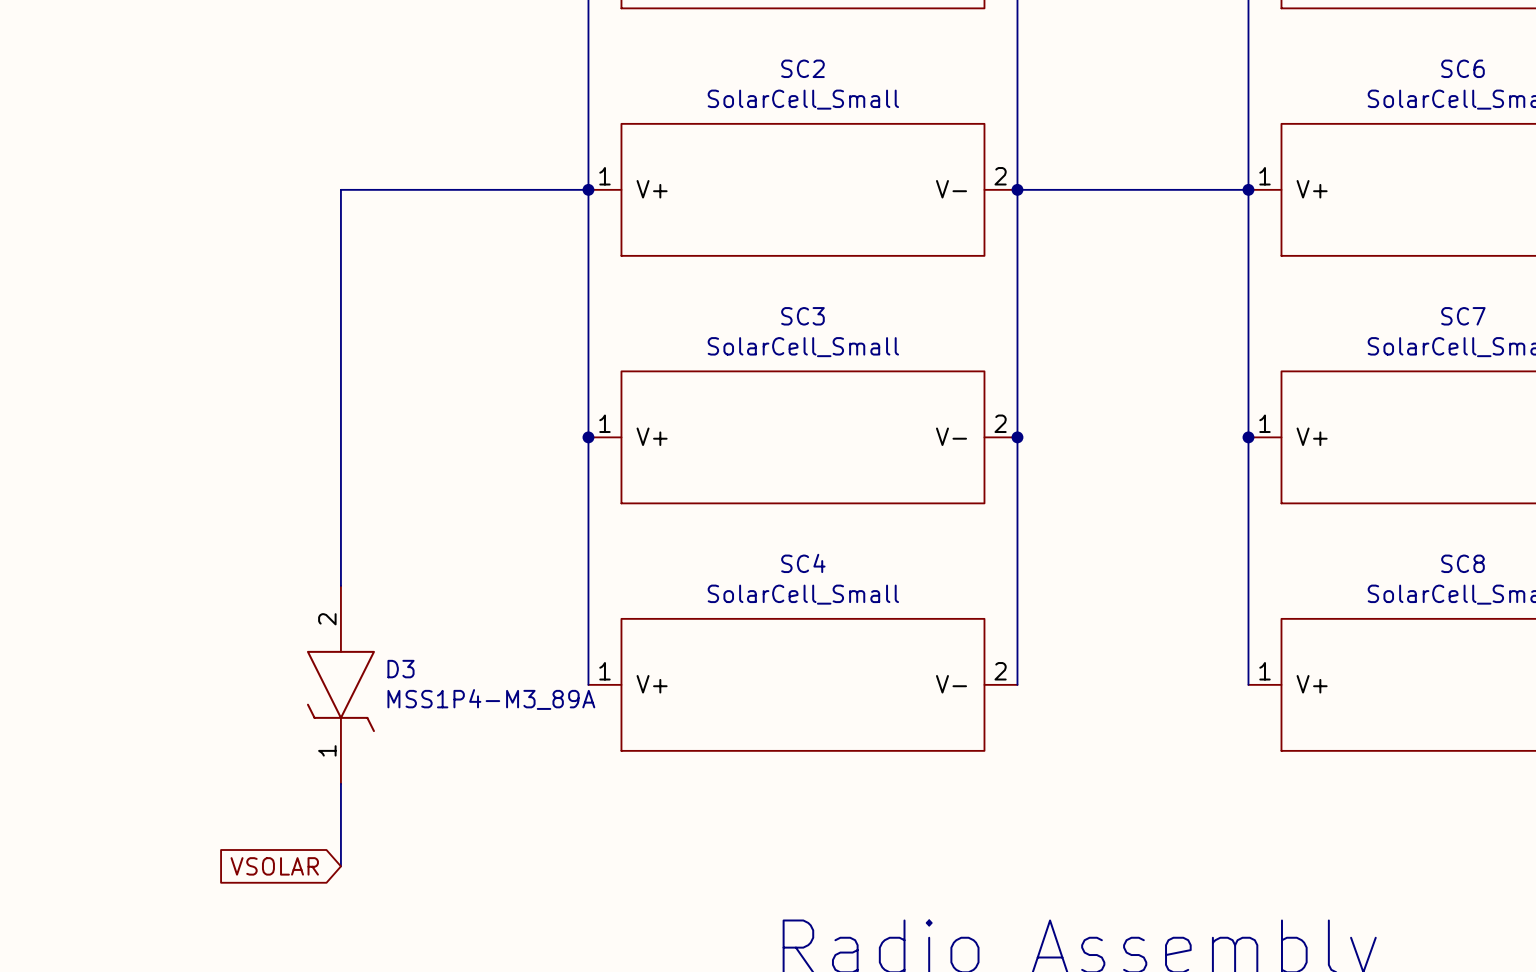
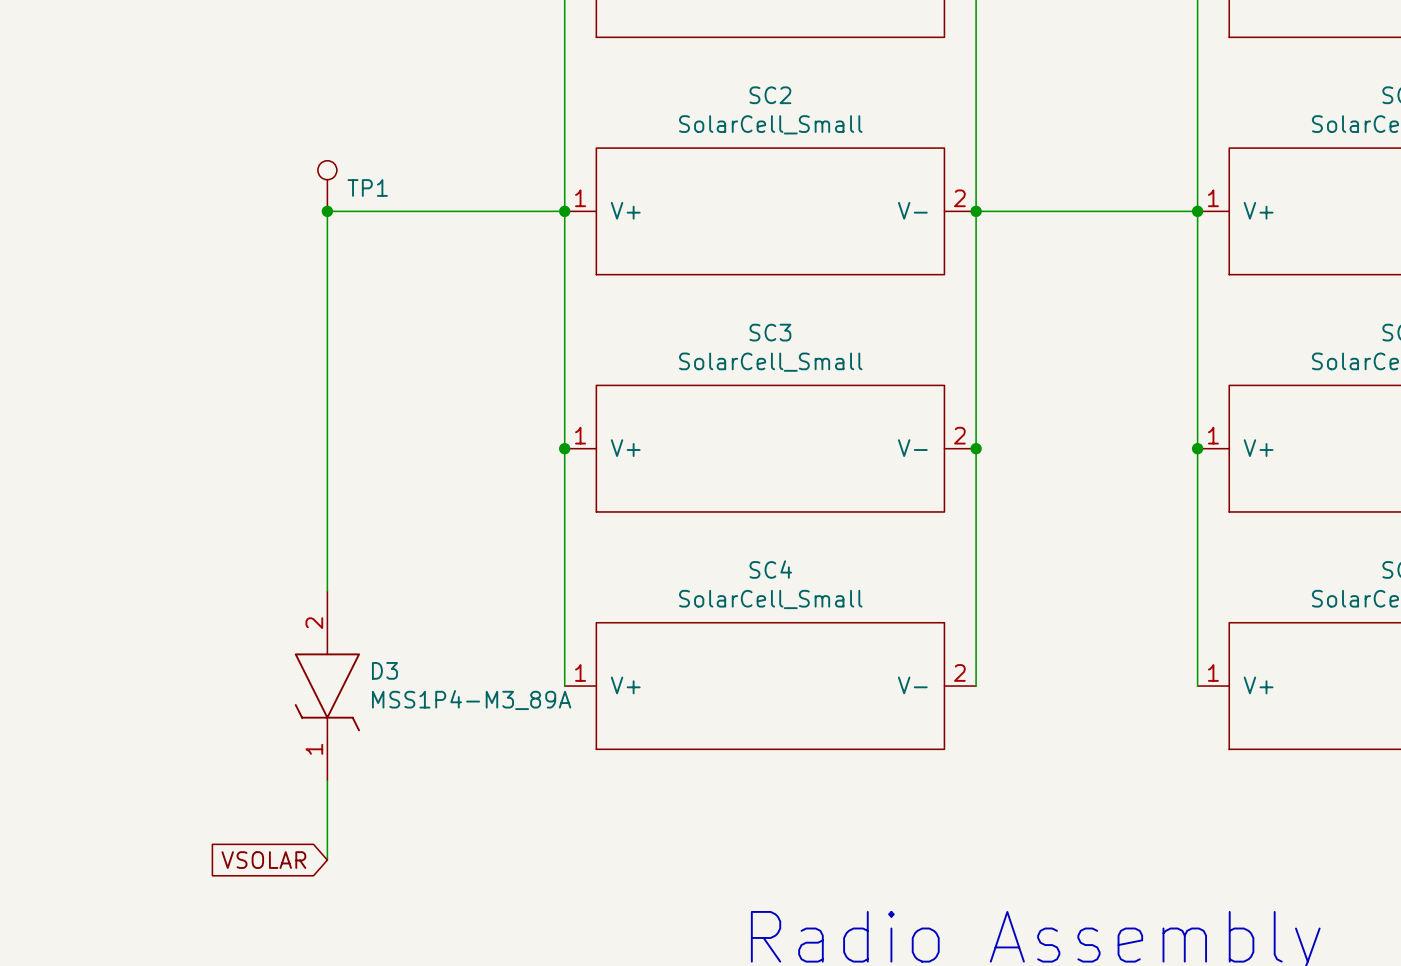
TP1: none -> (327, 186)
junction: none -> (327, 211)

